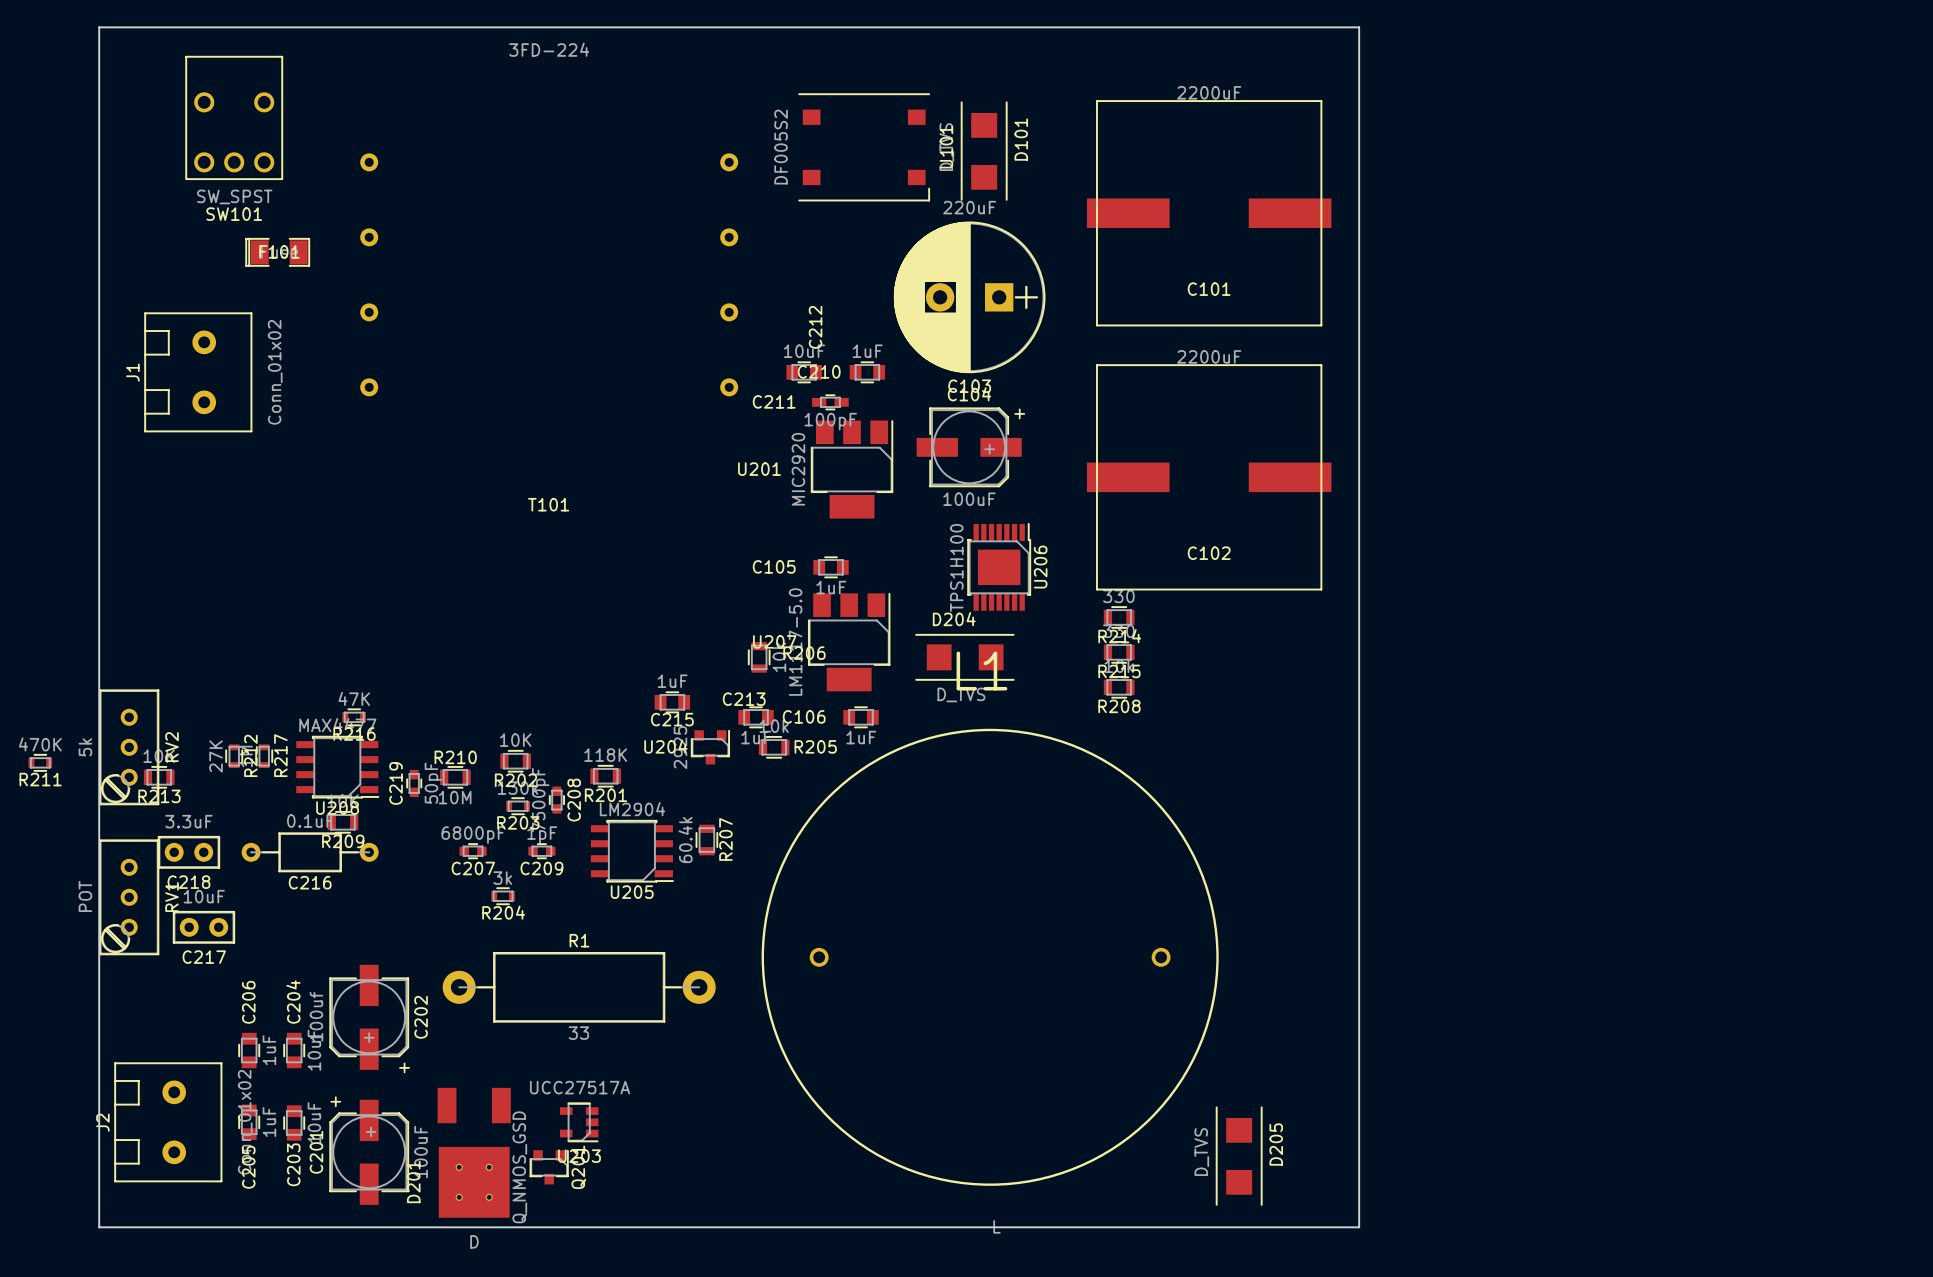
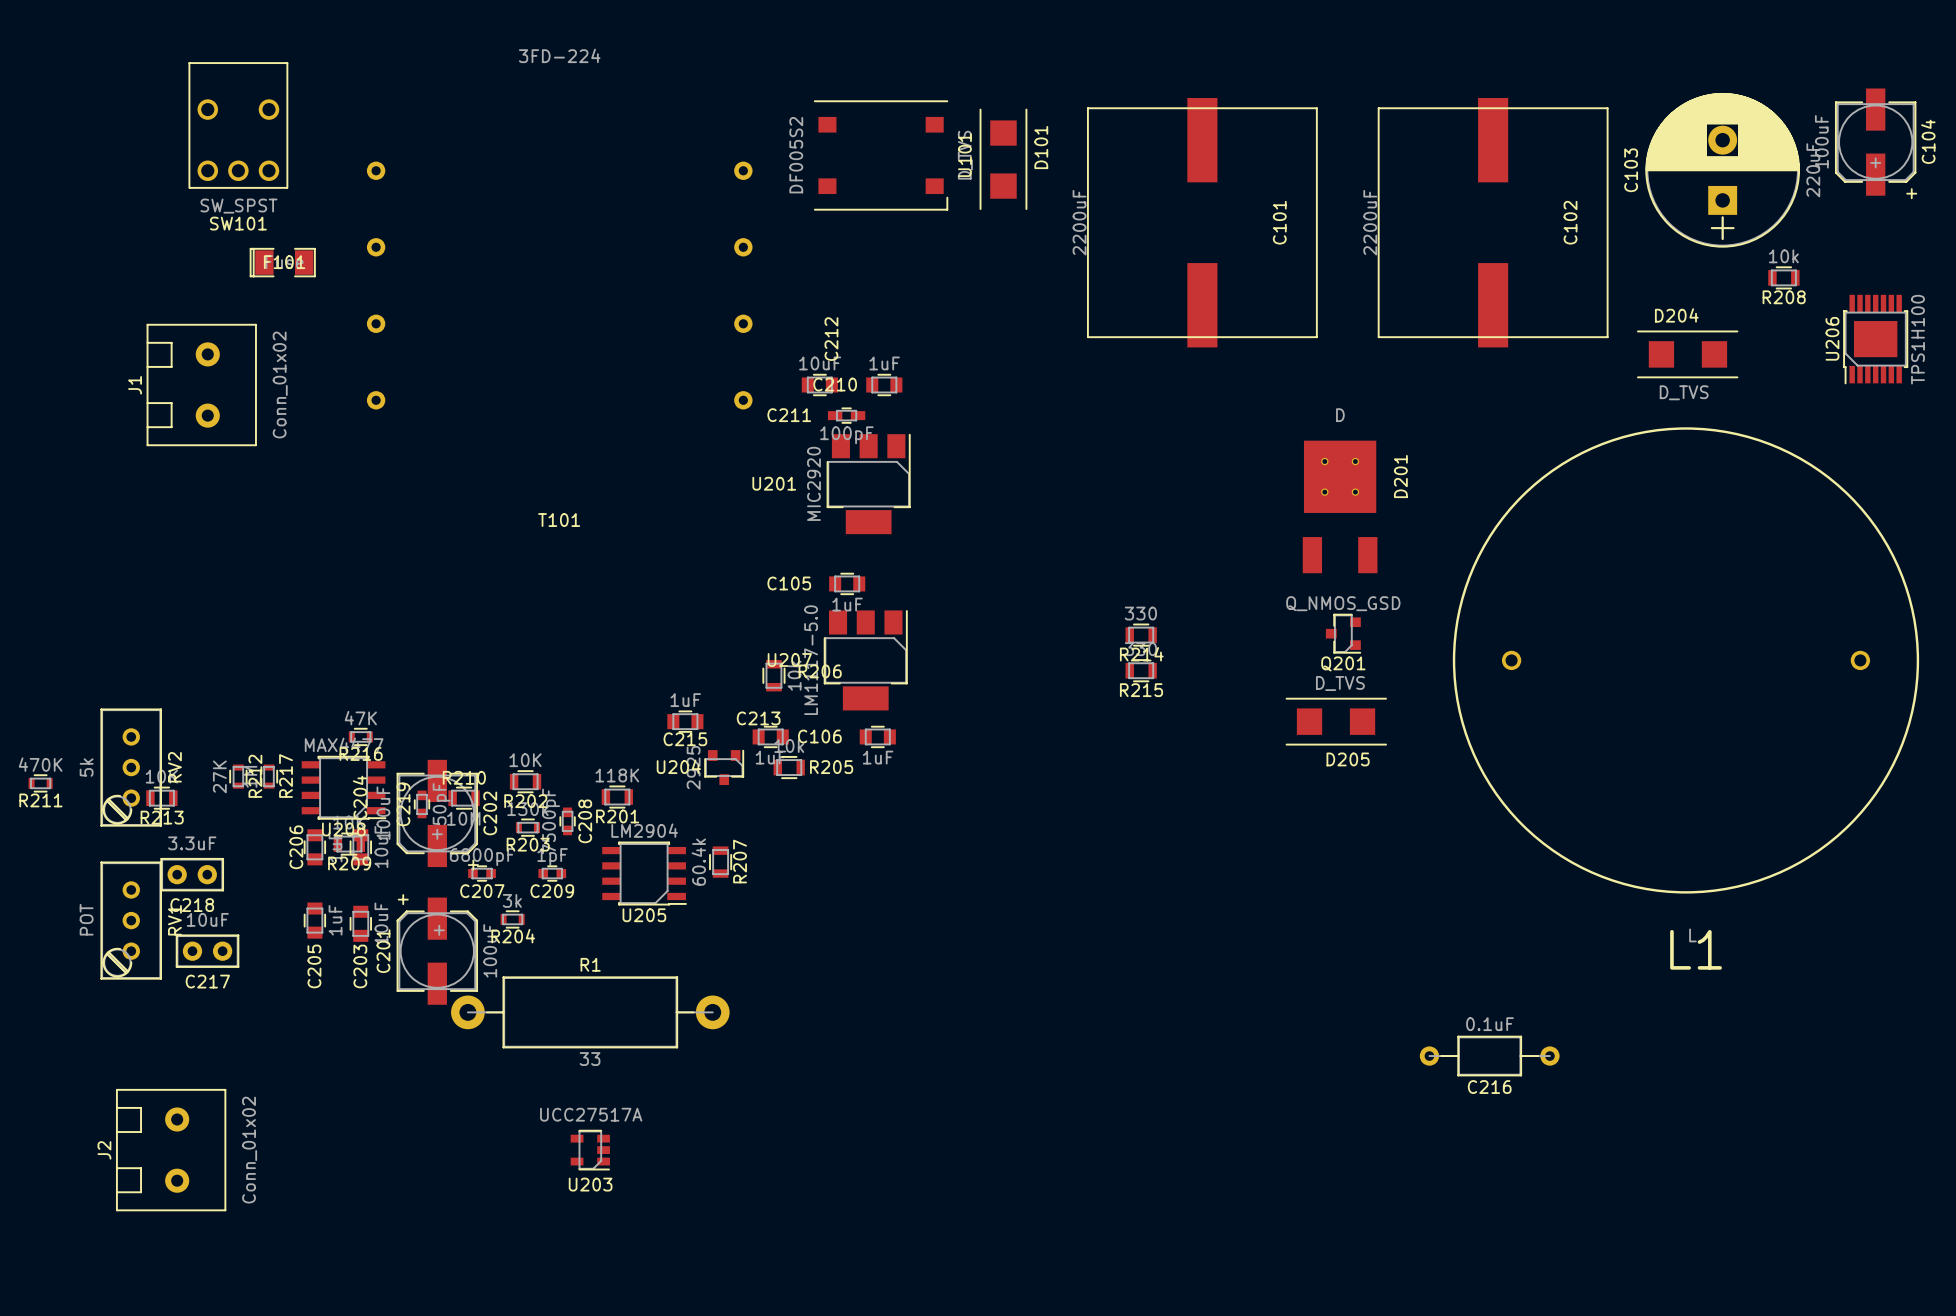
board edge: (99, 27) (1359, 27) (1359, 1227) (99, 1227) (99, 27) -> none
C101 value position: 2200uF (1209, 92) -> 2200uF (1079, 222)
C101 rotation: 0° (1209, 213) -> 90° clockwise (1202, 222)
C101 name position: C101 (1209, 289) -> C101 (1279, 222)
C103 rotation: 0° (969, 297) -> 90° clockwise (1722, 170)
C103 position: (969, 297) -> (1722, 170)
C102 value position: 2200uF (1209, 356) -> 2200uF (1370, 222)
C104 rotation: 0° (969, 447) -> 90° clockwise (1875, 142)
C104 position: (969, 447) -> (1875, 142)
C102 rotation: 0° (1209, 477) -> 90° clockwise (1493, 222)
C102 position: (1209, 477) -> (1493, 222)
C102 name position: C102 (1209, 553) -> C102 (1570, 222)
U206 rotation: 0° (999, 566) -> 180° (1875, 339)
U206 position: (999, 566) -> (1875, 339)
D204 position: (964, 657) -> (1687, 354)
L1 name position: L1 (981, 671) -> L1 (1696, 949)
R208 position: (1119, 687) -> (1783, 277)
C216 position: (310, 852) -> (1489, 1056)
L1 position: (990, 957) -> (1685, 660)
C206 name position: C206 (248, 1002) -> C206 (296, 847)
C202 value: 100uf (316, 1016) -> 100uF (383, 813)
C202 position: (369, 1017) -> (437, 813)
C206 position: (249, 1050) -> (314, 847)
C204 position: (294, 1050) -> (360, 847)
C205 position: (249, 1122) -> (314, 920)
C203 position: (294, 1123) -> (360, 923)
C201 position: (369, 1152) -> (437, 951)
D201 rotation: 0° (474, 1152) -> 180° (1340, 506)
D201 position: (474, 1152) -> (1340, 506)
D205 rotation: 0° (1239, 1156) -> 90° clockwise (1336, 721)
D205 position: (1239, 1156) -> (1336, 721)
Q201 rotation: 0° (549, 1167) -> 90° clockwise (1343, 633)
Q201 position: (549, 1167) -> (1343, 633)

